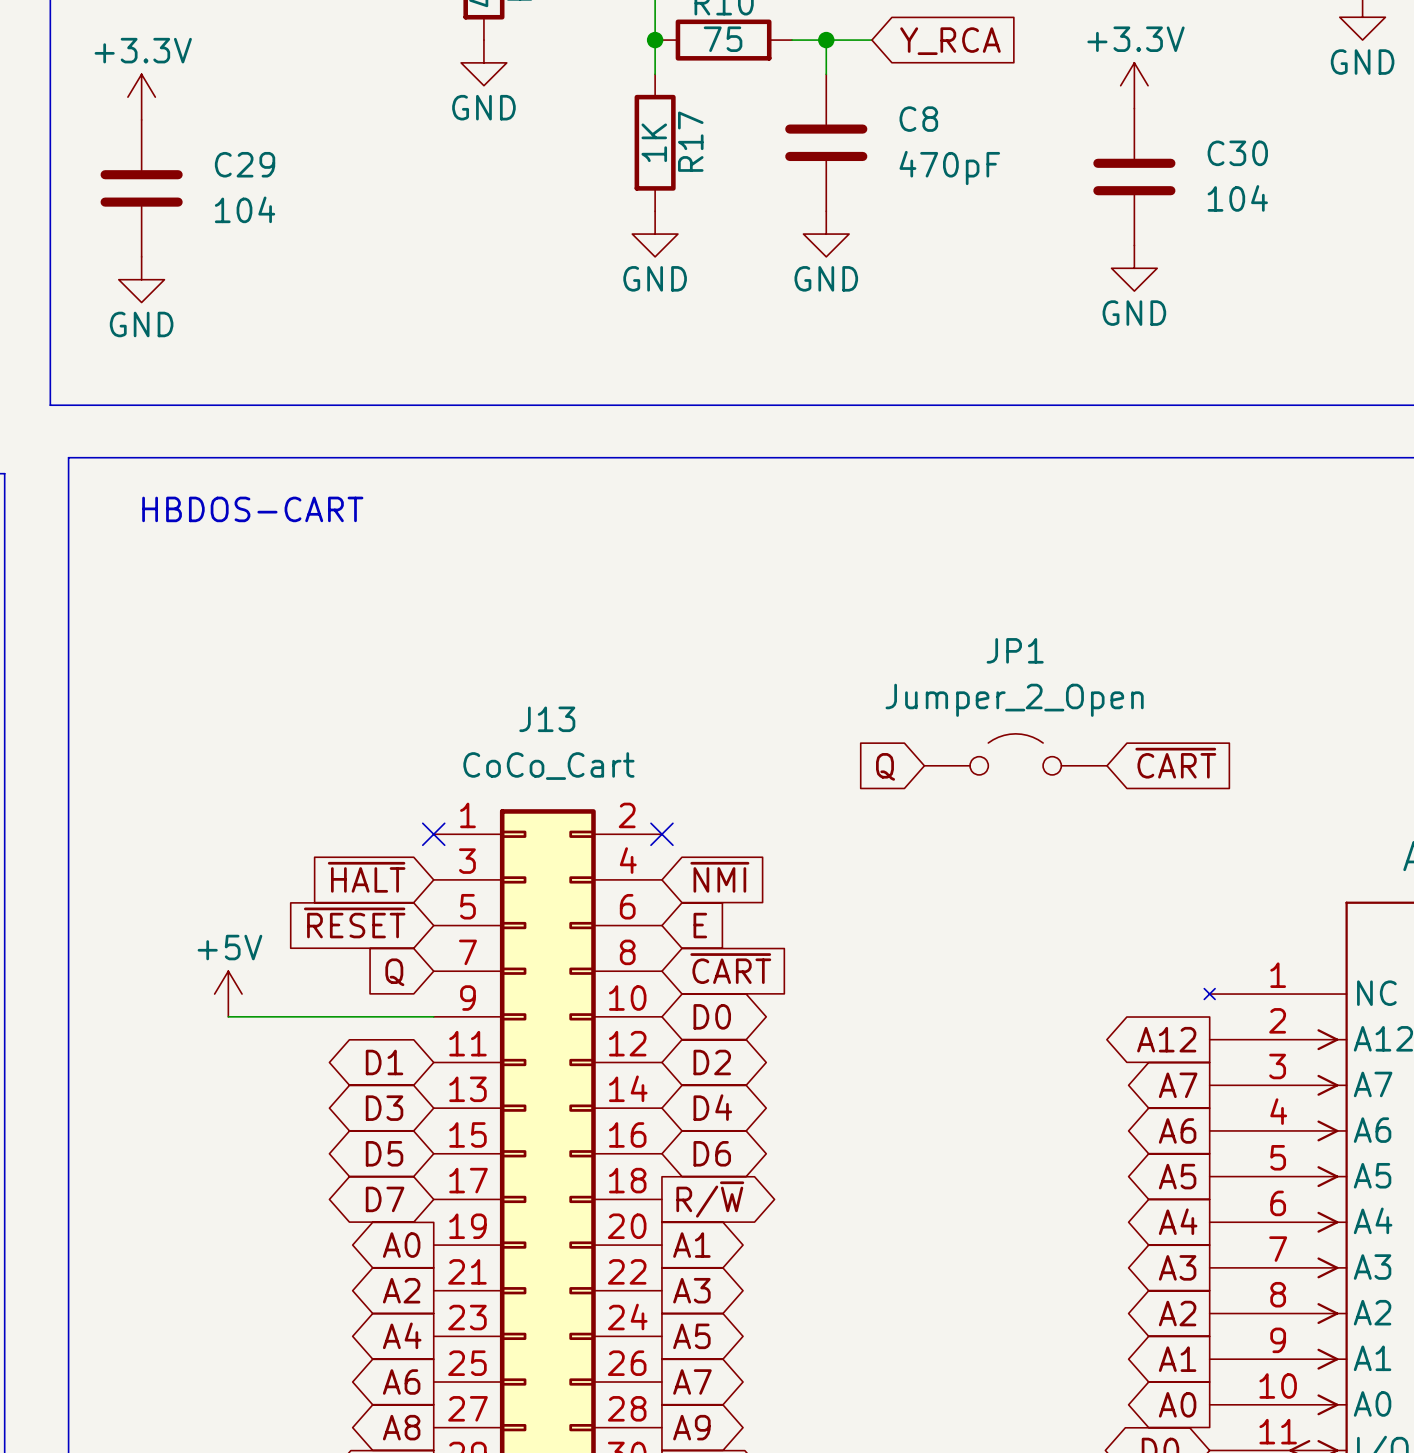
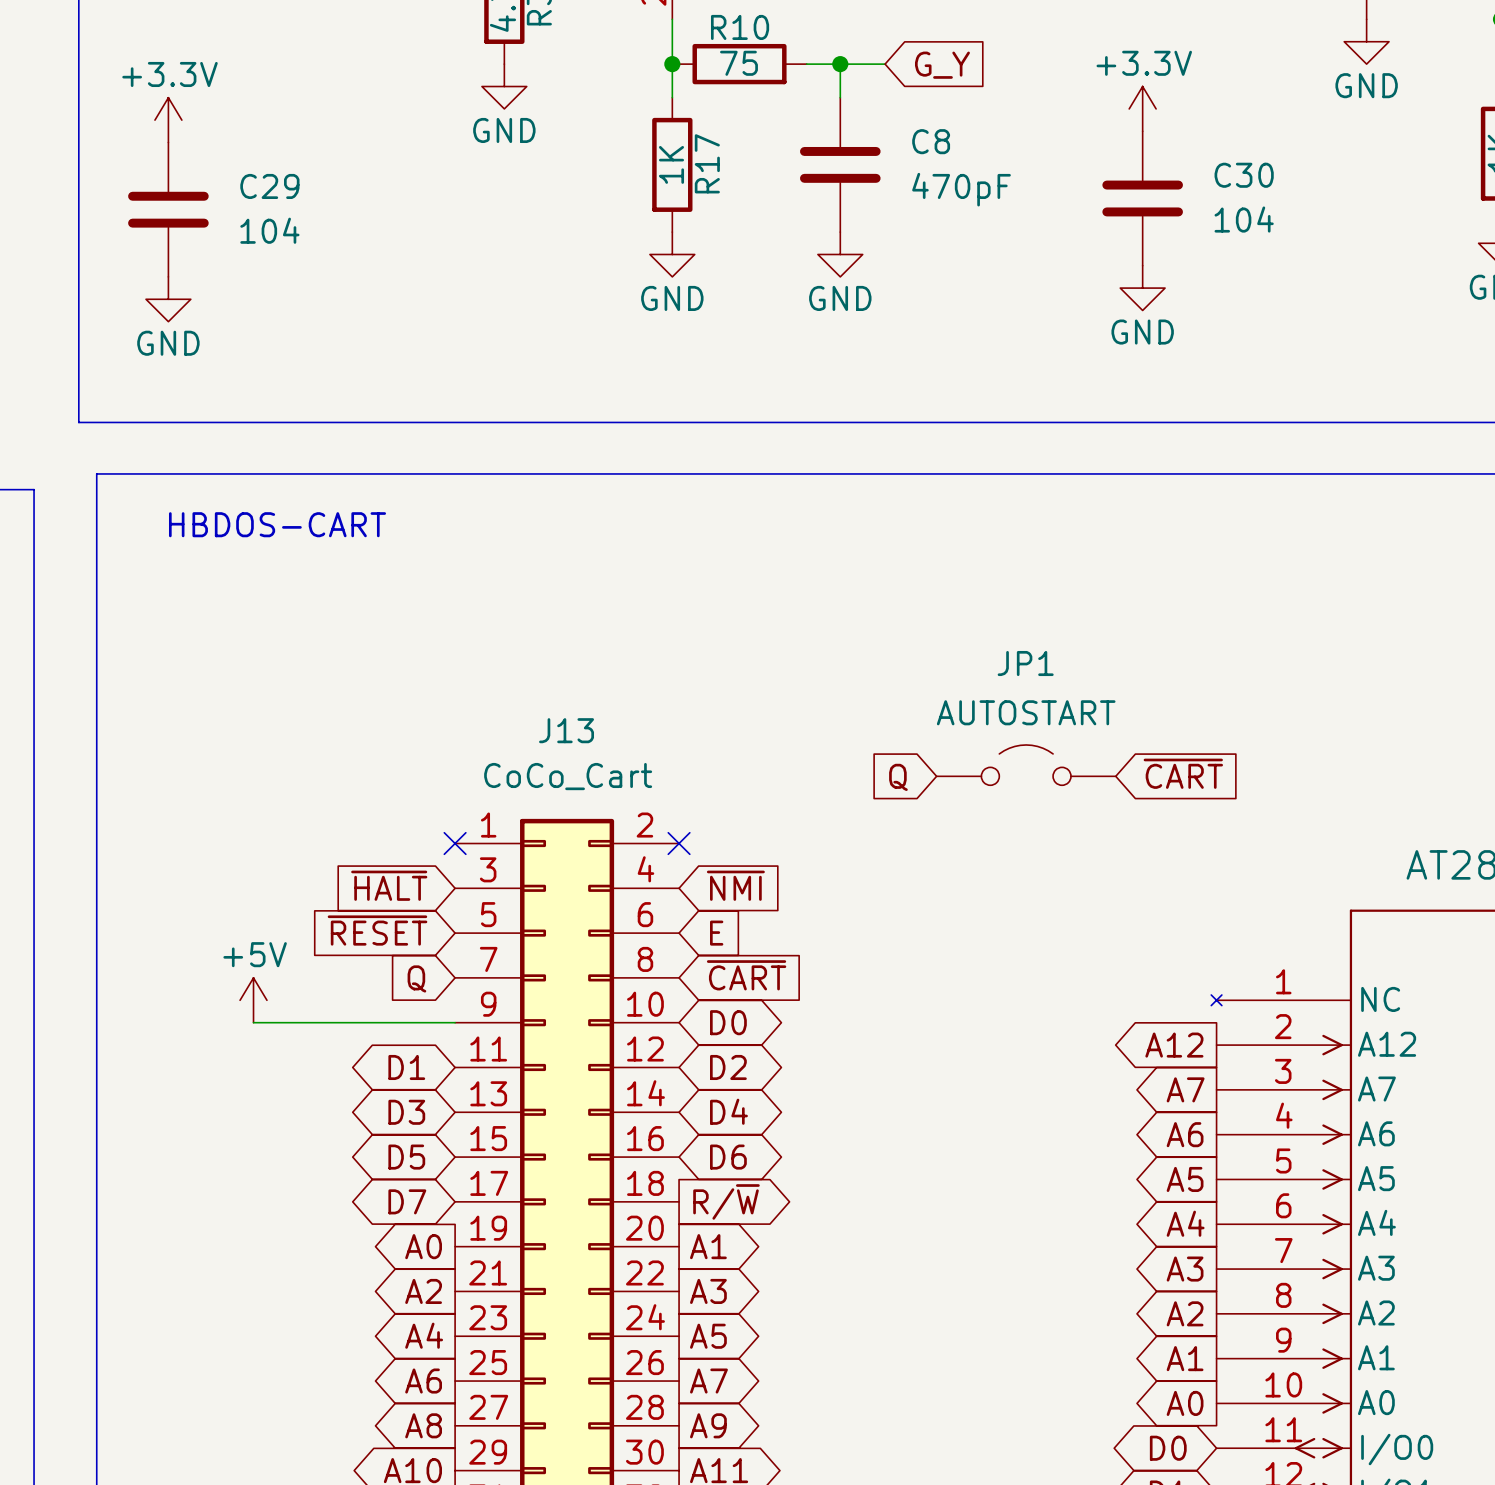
global label: Y_RCA (950, 41) -> G_Y (942, 65)
JP1 value: Jumper_2_Open (1014, 700) -> AUTOSTART (1026, 712)

